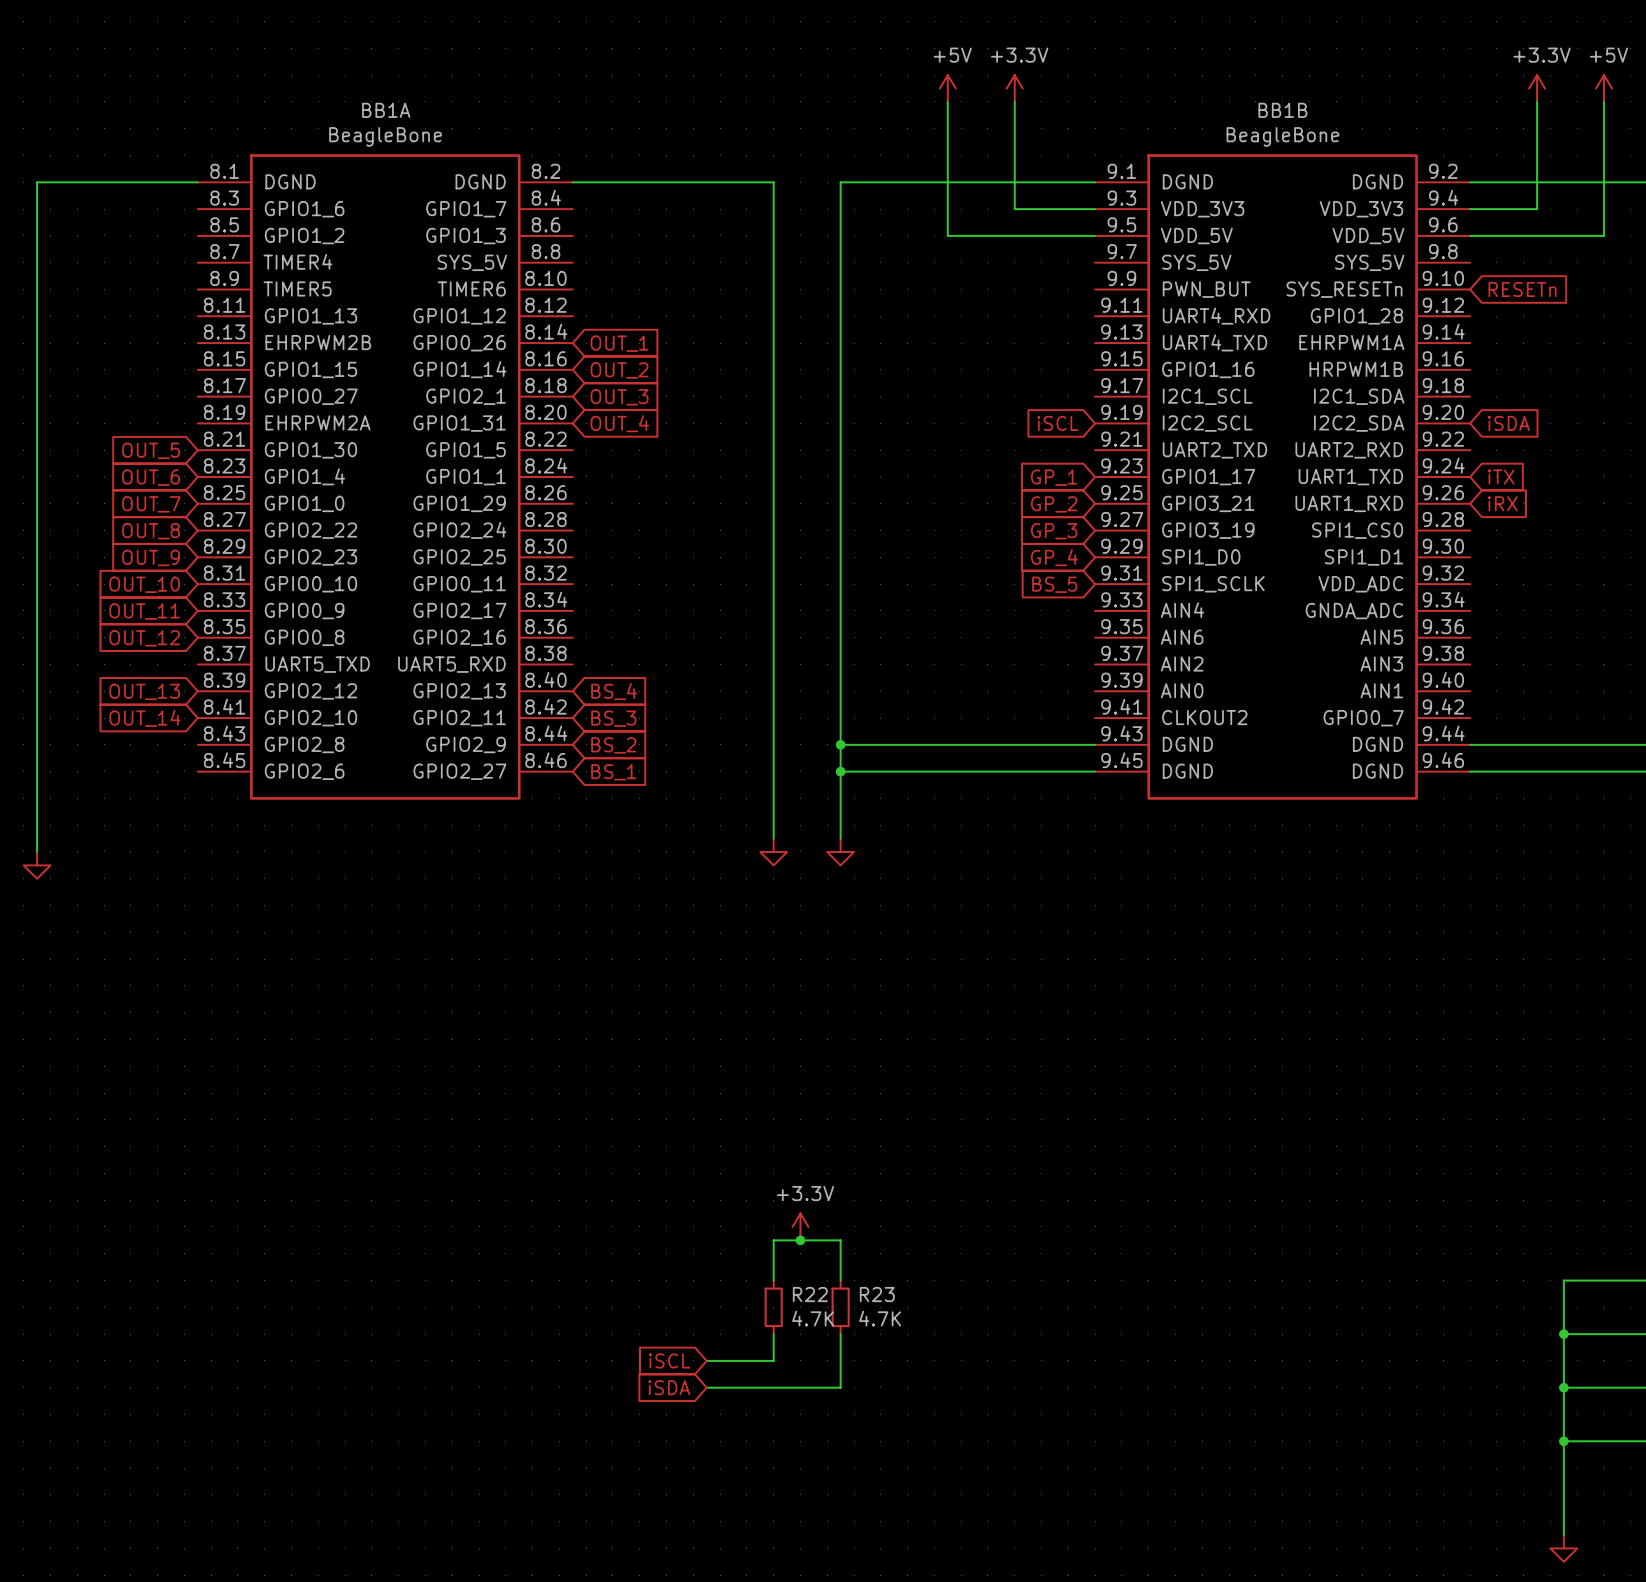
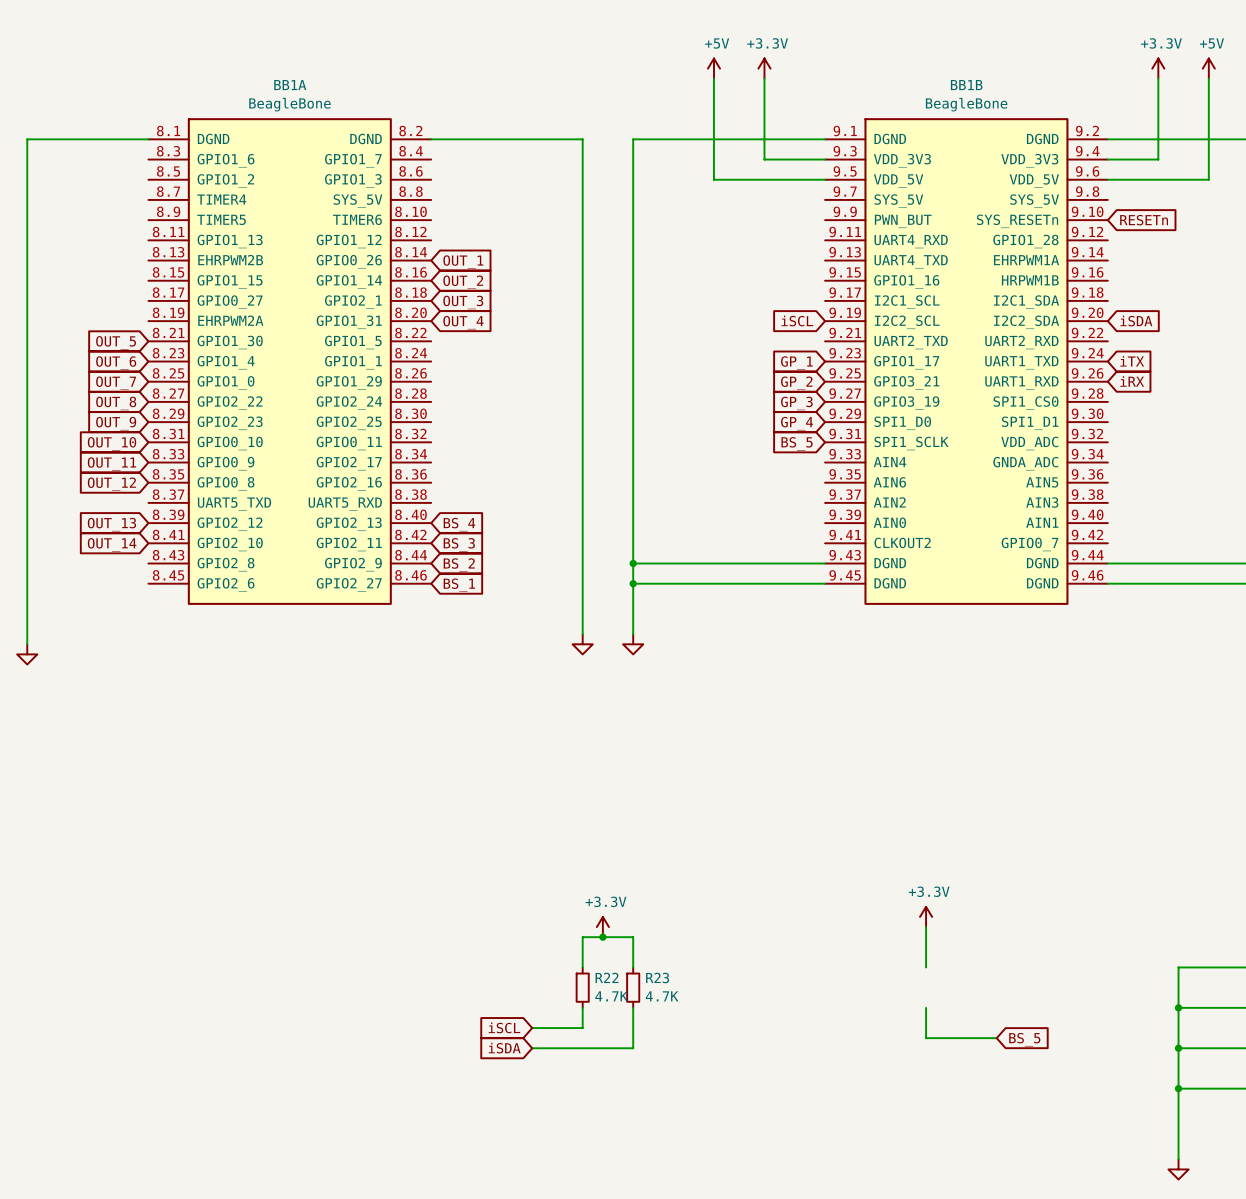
power symbol: none -> +3.3V (926, 916)
wire: none -> (926, 927) (926, 967)
wire: none -> (926, 1007) (926, 1038) (996, 1038)
global label: none -> BS_5 (1024, 1039)

